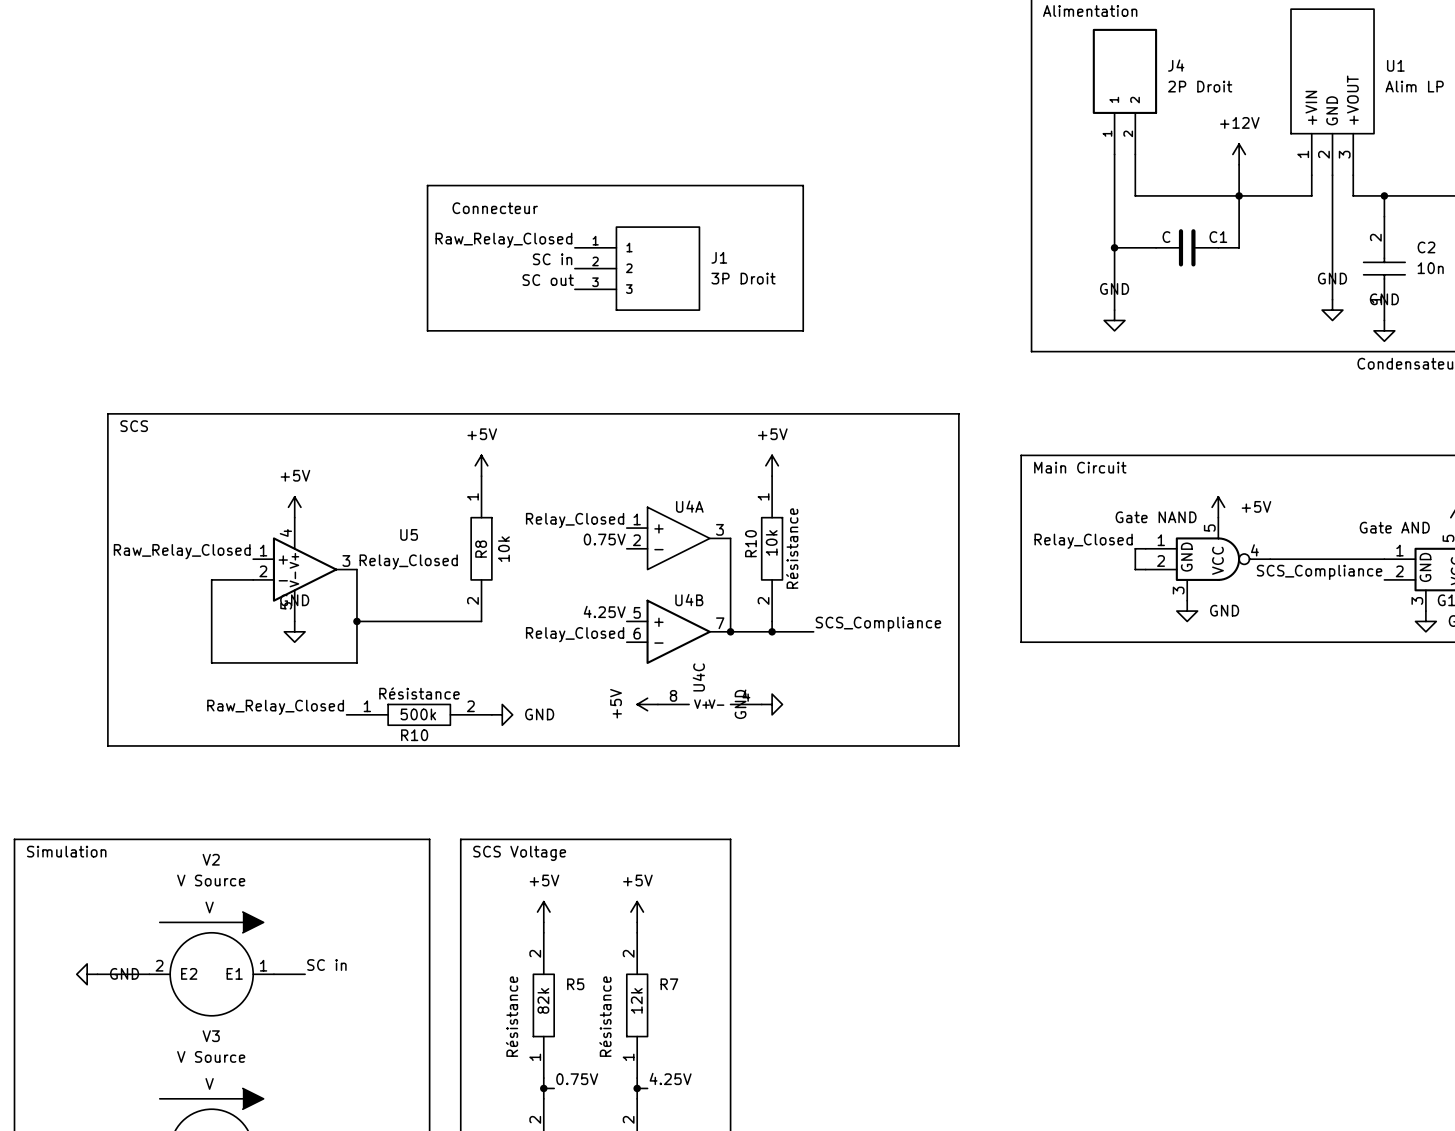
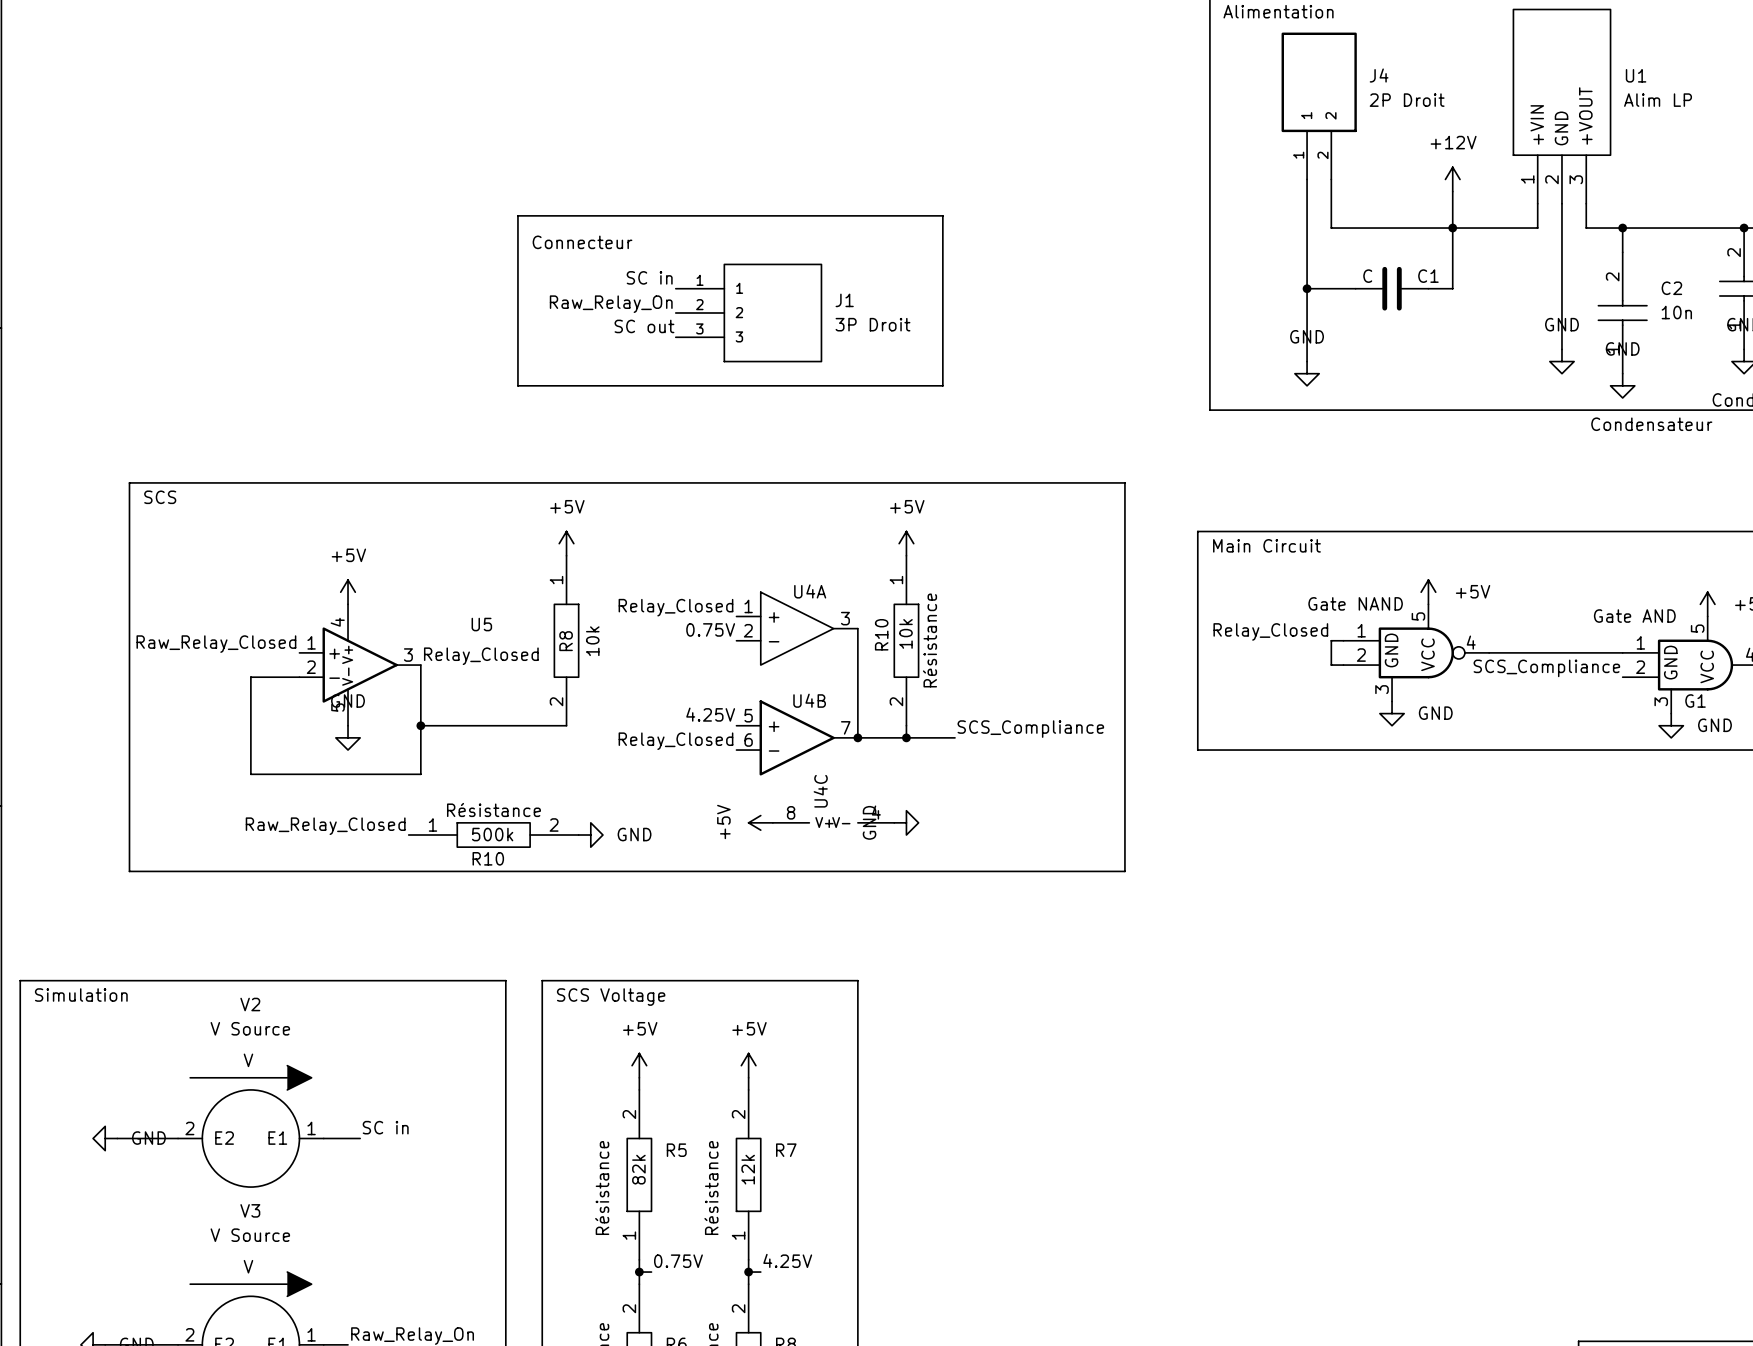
line: (440, 185) (427, 185) (427, 330) (440, 330) -> (517, 215) (517, 385)
label: Raw_Relay_Closed (503, 240) -> SC in (649, 277)
label: SC in (552, 259) -> Raw_Relay_On (611, 304)

